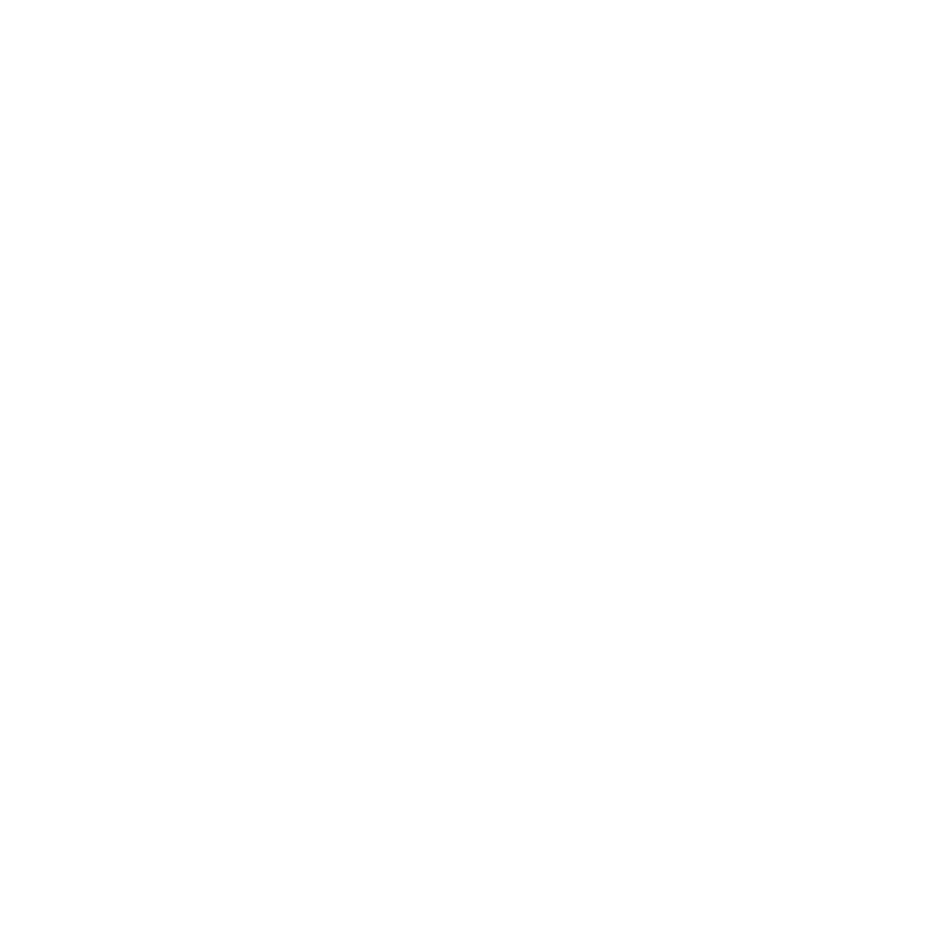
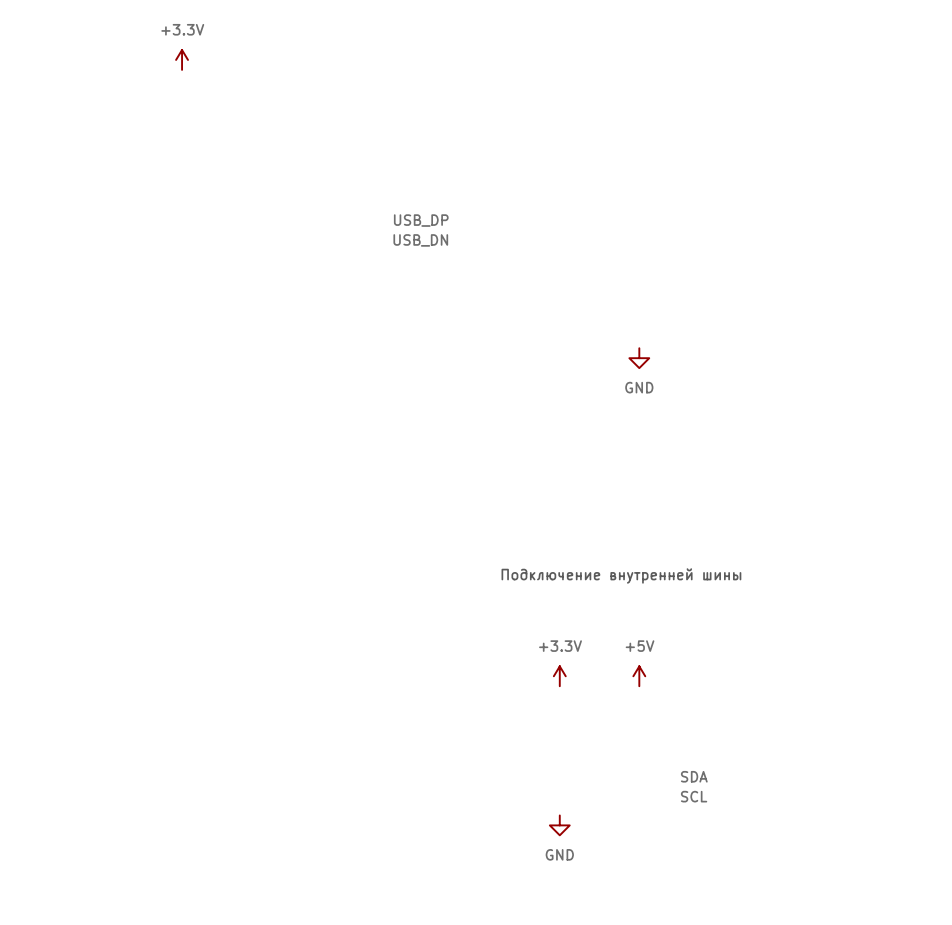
power symbol: none -> +3.3V (182, 59)
label: none -> USB_DP (421, 220)
label: none -> USB_DN (420, 240)
power symbol: none -> GND (639, 358)
text: none -> Подключение внутренней шины (621, 575)
power symbol: none -> +3.3V (559, 676)
power symbol: none -> +5V (639, 676)
label: none -> SDA (694, 776)
label: none -> SCL (694, 796)
power symbol: none -> GND (559, 825)

